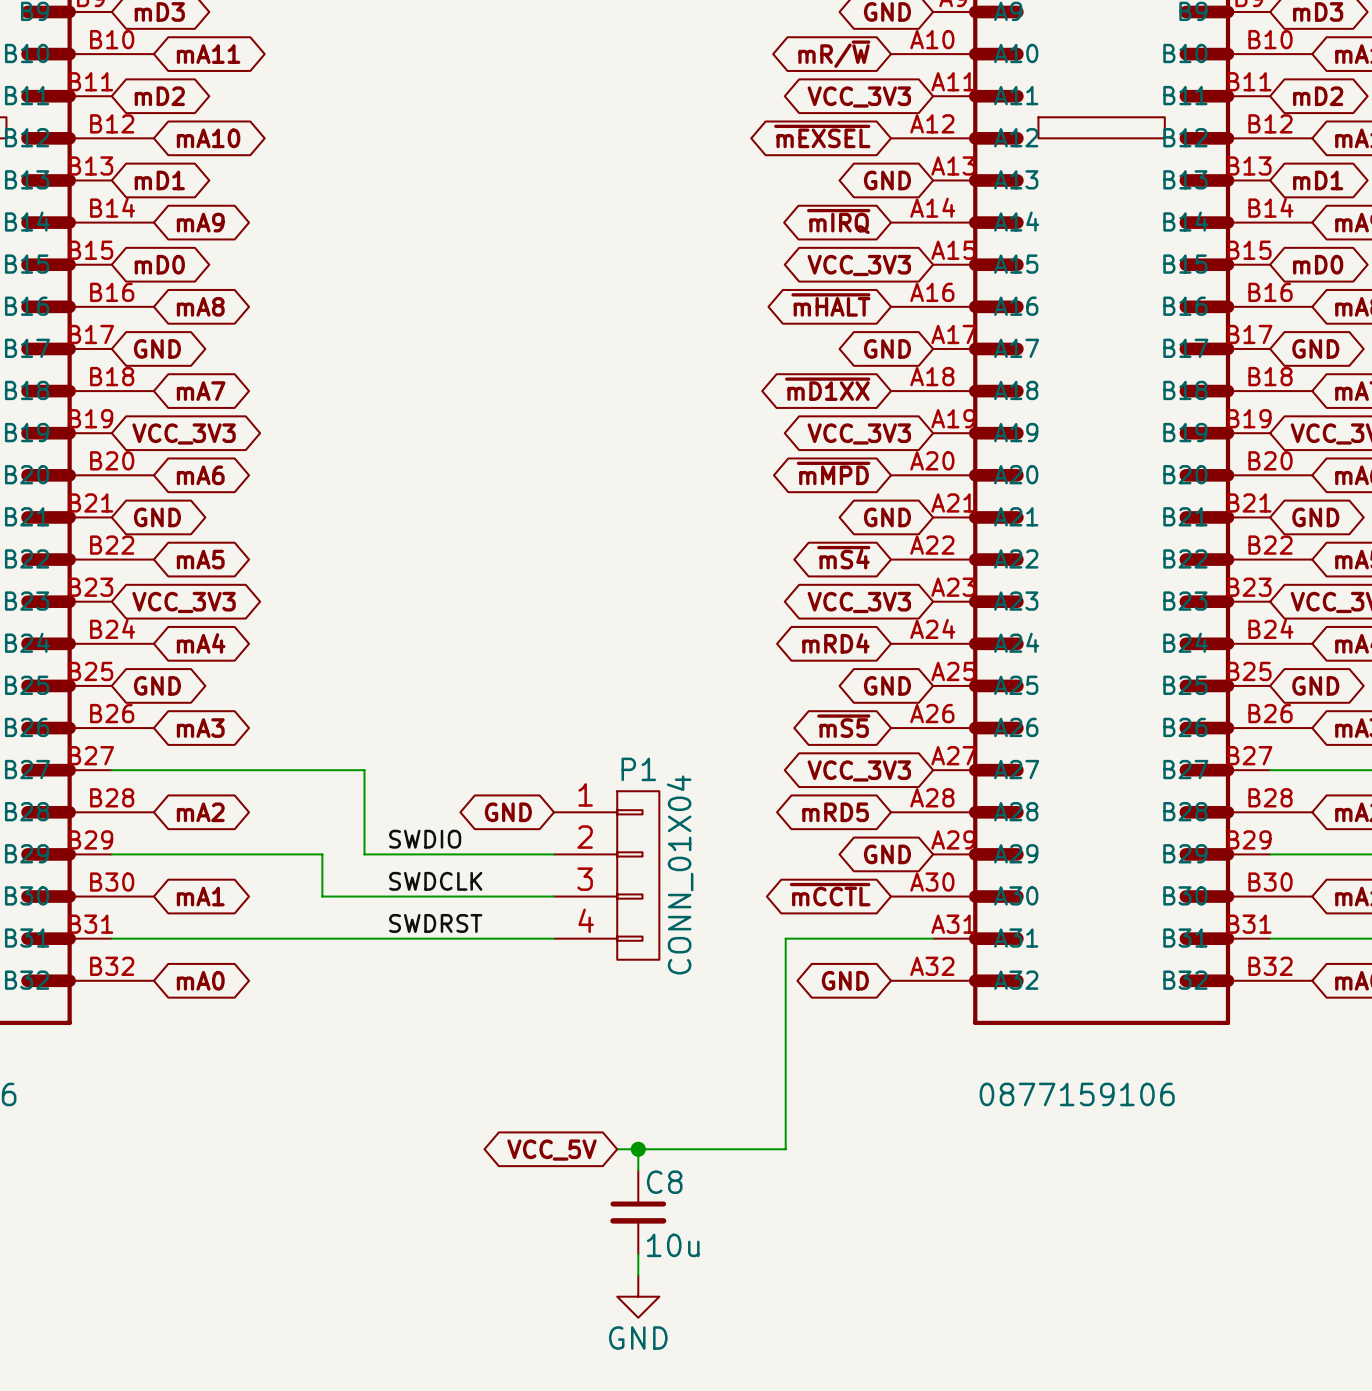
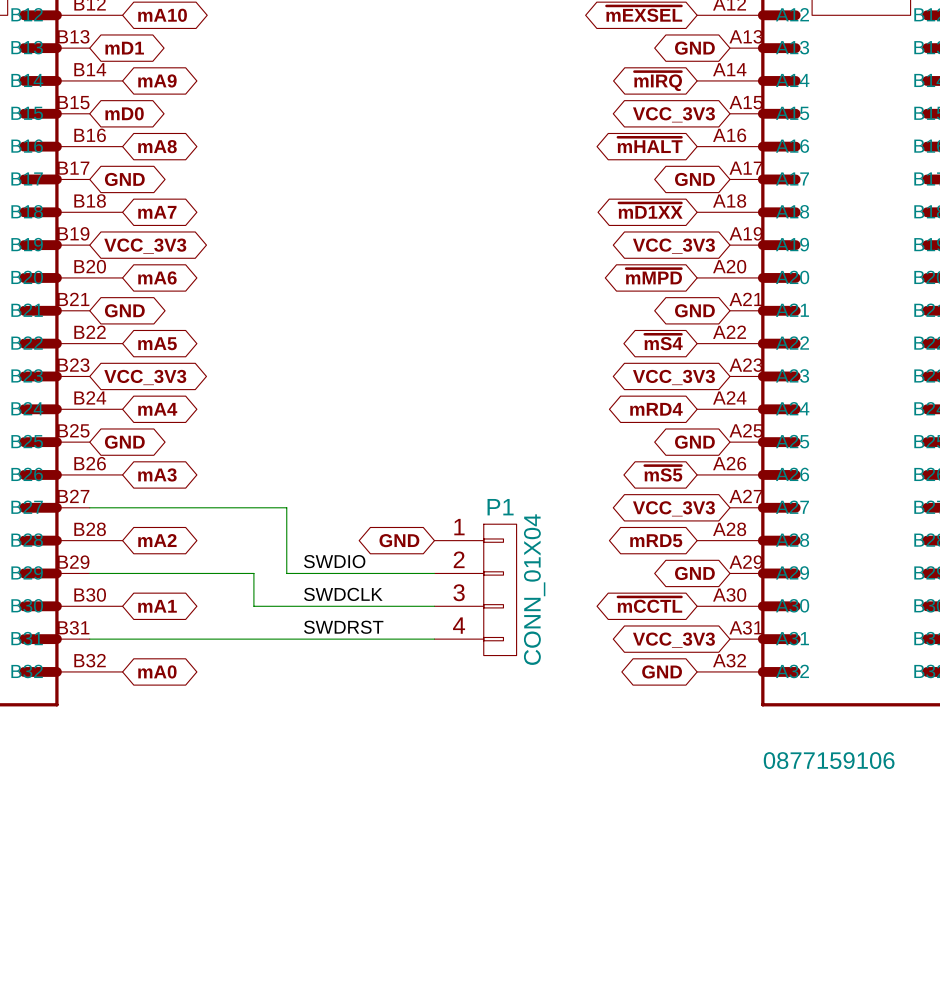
wire: (933, 938) (785, 938) (785, 1149) (617, 1149) -> none
global label: none -> VCC_3V3 (673, 640)
wire: (638, 1149) (638, 1170) -> none
junction: (638, 1149) -> none
global label: VCC_5V (551, 1150) -> none
C8: 10u (638, 1212) -> none
wire: (638, 1254) (638, 1275) -> none
power symbol: GND (638, 1296) -> none

